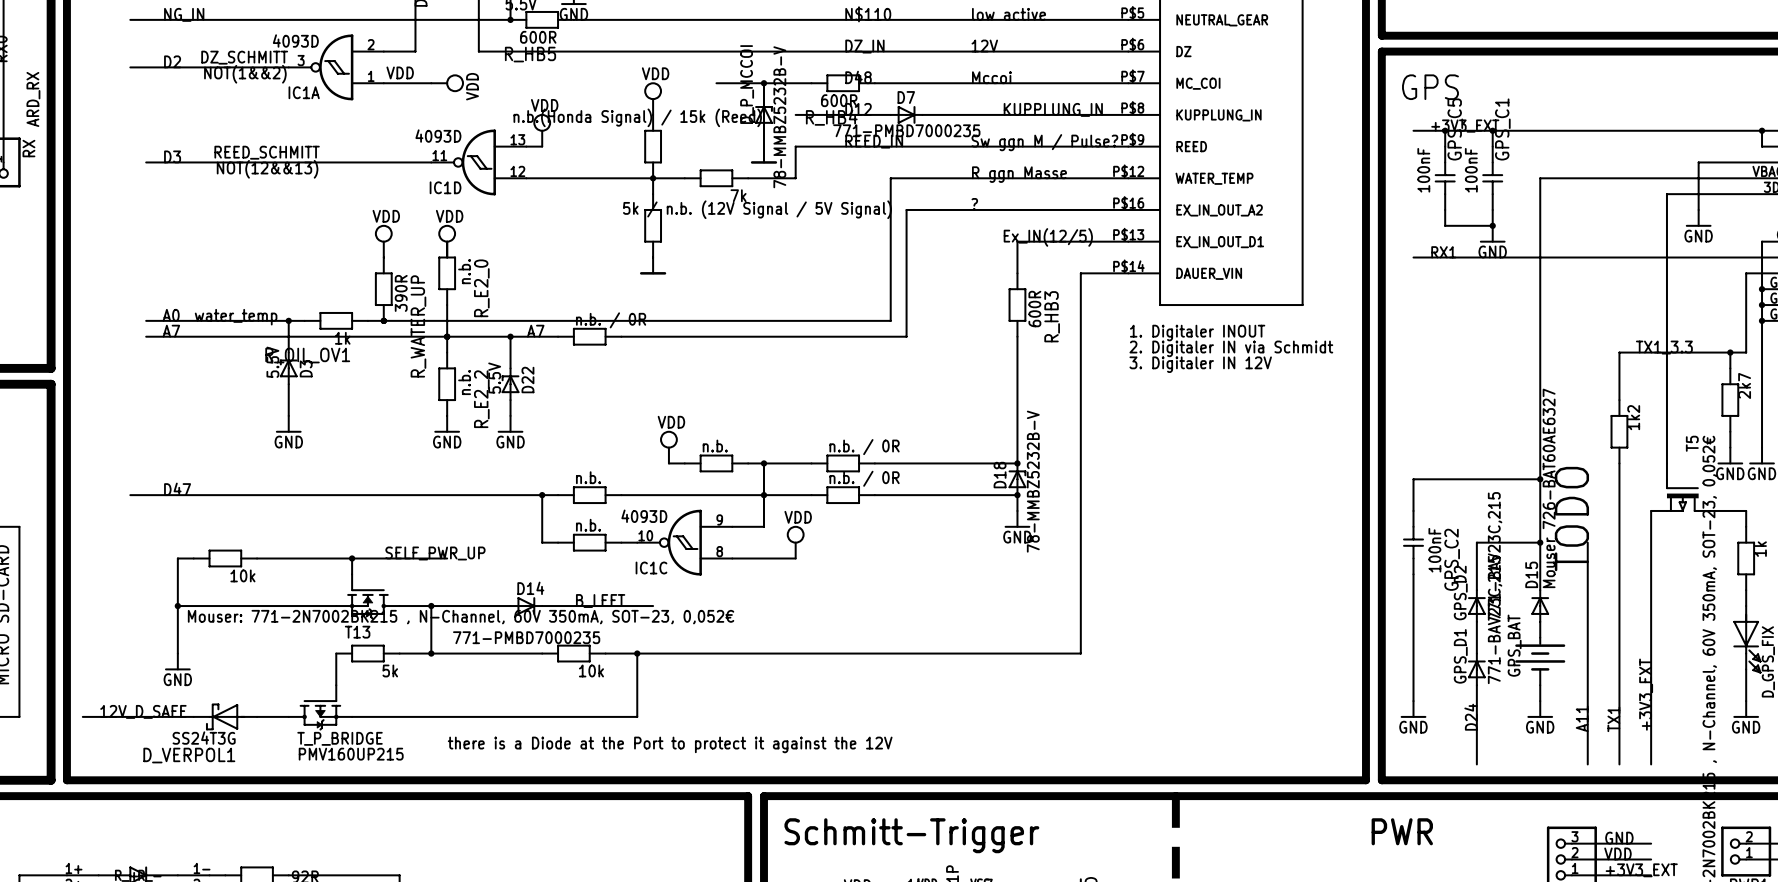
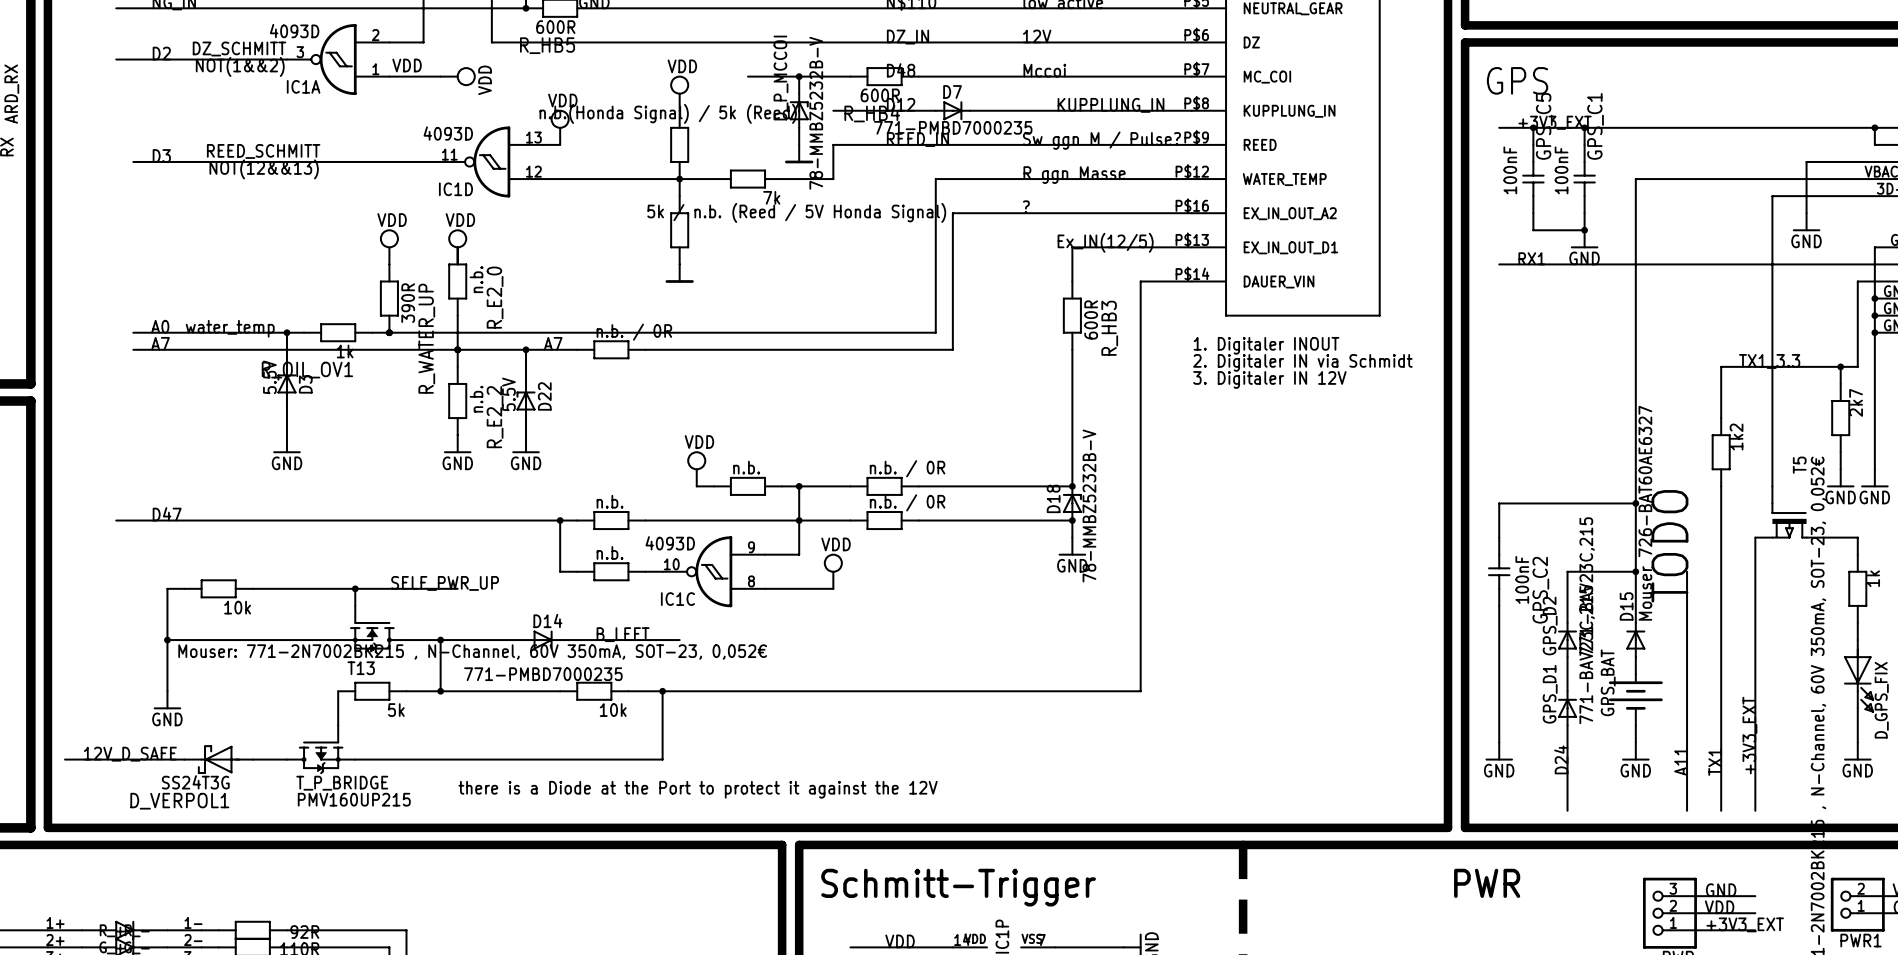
part value: n.b.(Honda Signal) / 15k (Reed) (637, 117) -> n.b.(Honda Signal) / 5k (Reed) (668, 113)
part value: 5k / n.b. (12V Signal / 5V Signal) (757, 209) -> 5k / n.b. (Reed / 5V Honda Signal) (796, 212)

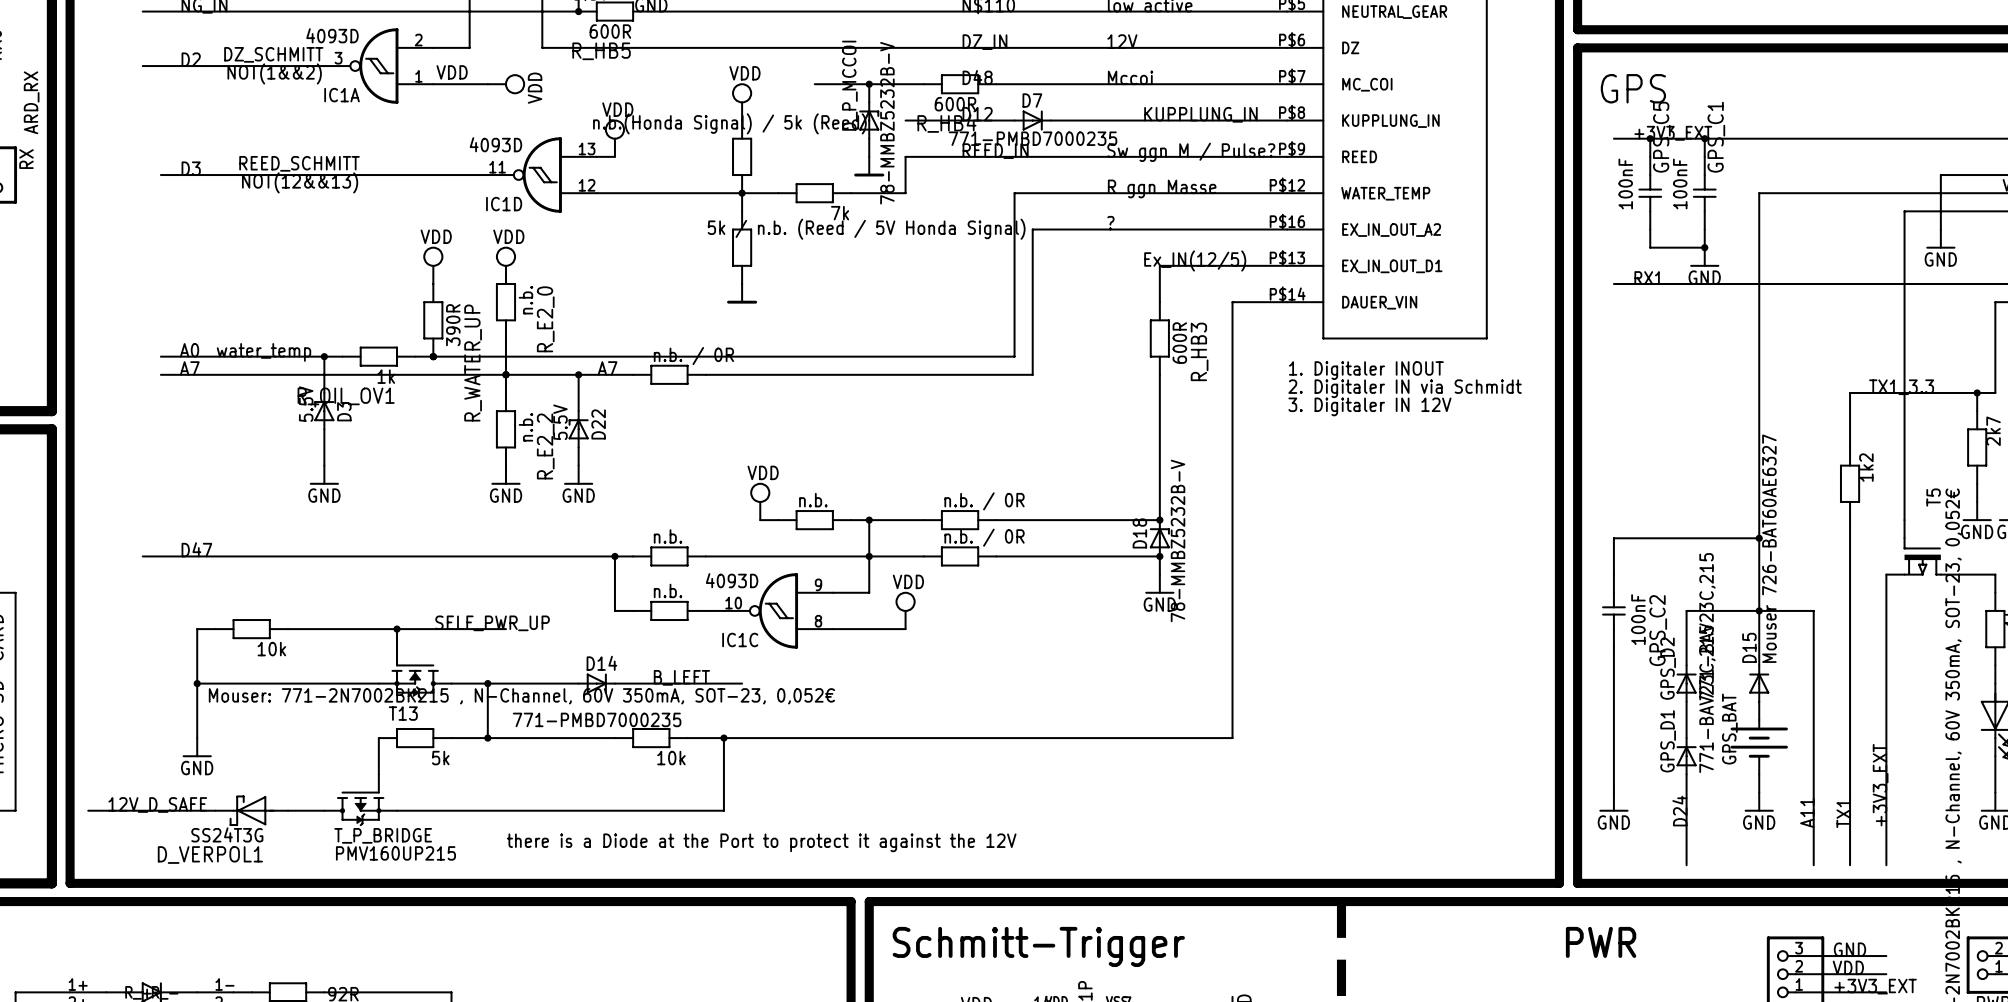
text: TODO (1669, 546) -> none
wire: none -> (1759, 610) (1813, 610)

